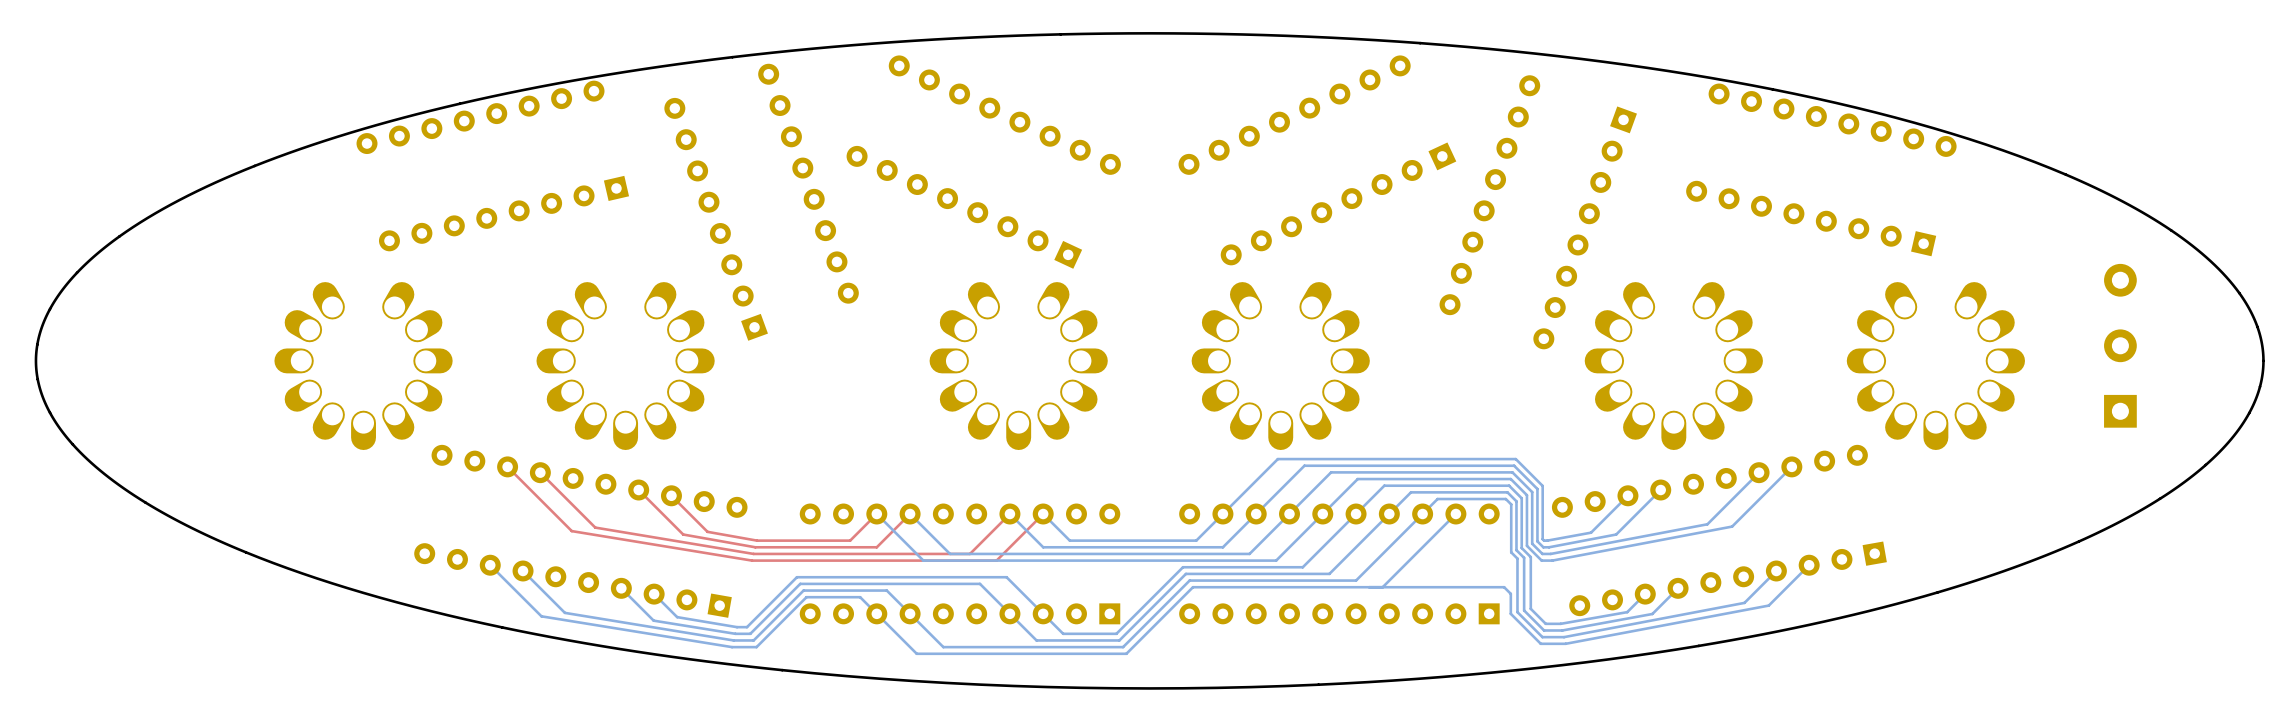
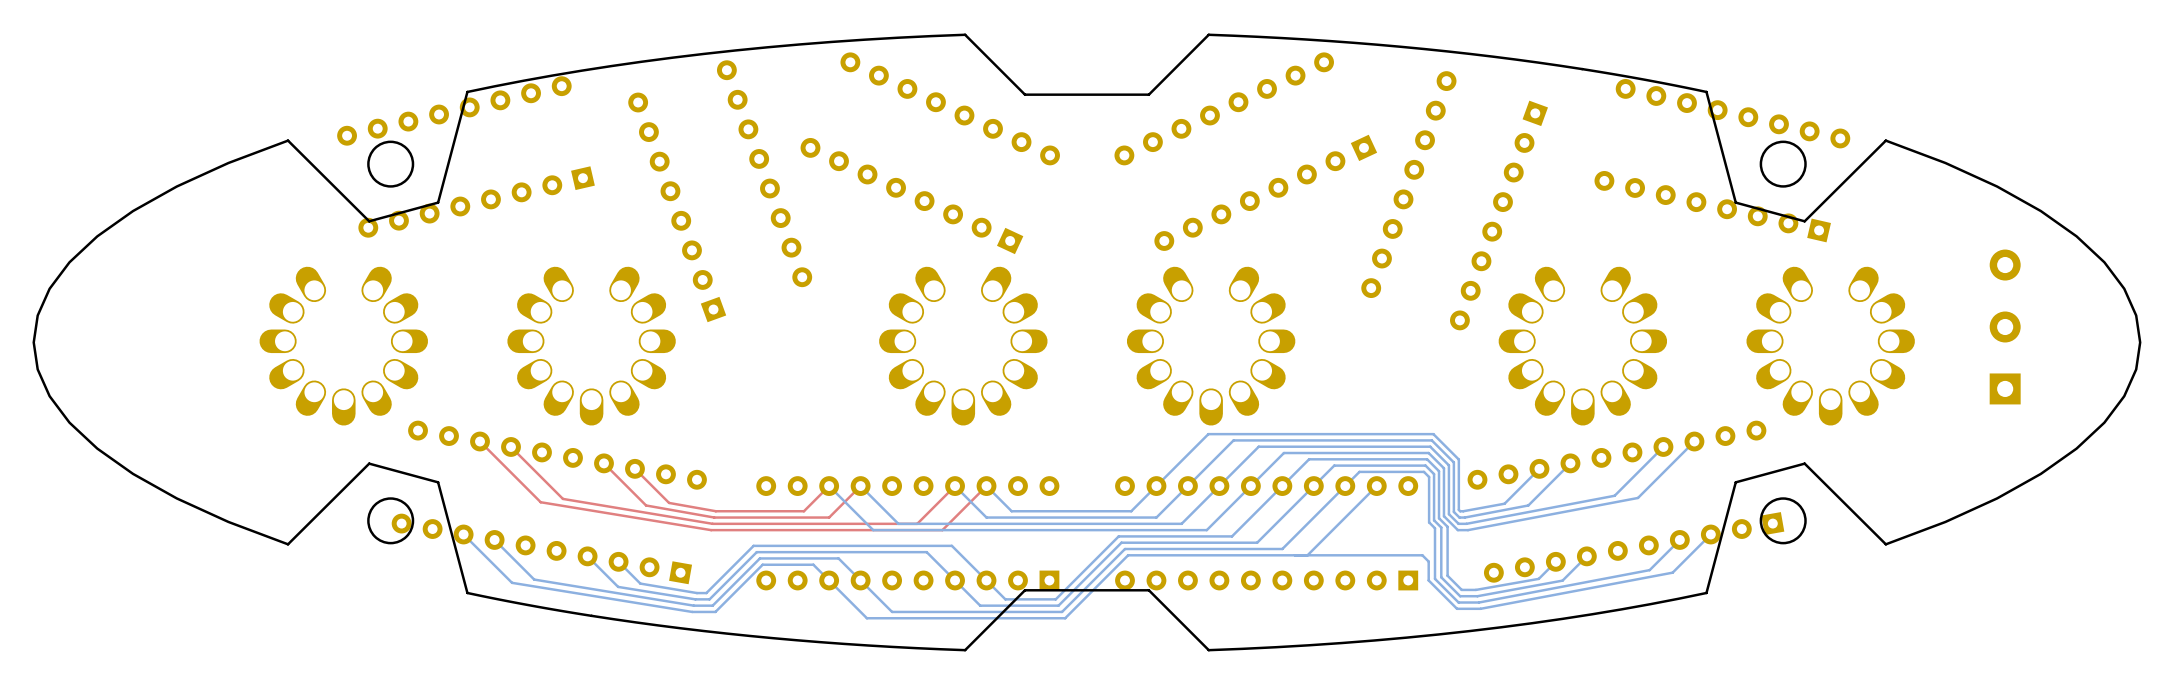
board edge: (1060, 34) (955, 38) (832, 46) (732, 57) (625, 71) (540, 86) (445, 107) (363, 128) (288, 153) (224, 178) (171, 204) (119, 236) (83, 265) (56, 297) (41, 329) (35, 362) (41, 394) (56, 422) (79, 451) (113, 481) (156, 509) (204, 534) (259, 557) (316, 578) (396, 602) (483, 623) (568, 640) (745, 666) (847, 676) (946, 682) (1149, 688) (1343, 683) (1538, 667) (1631, 656) (1731, 640) (1809, 624) (1896, 603) (1966, 583) (2038, 558) (2095, 533) (2146, 507) (2190, 477) (2222, 448) (2245, 419) (2259, 389) (2262, 372) (2263, 354) (2260, 337) (2254, 318) (2233, 285) (2197, 249) (2148, 215) (2088, 184) (2019, 156) (1932, 127) (1855, 107) (1752, 85) (1646, 67) (1535, 53) (1420, 43) (1309, 36) (1173, 33) (1060, 34) -> (1208, 34) (1329, 41) (1470, 53) (1590, 70) (1706, 91) (1735, 202) (1804, 221) (1885, 140) (1945, 163) (1997, 186) (2040, 211) (2076, 236) (2104, 262) (2124, 288) (2136, 315) (2140, 342) (2136, 369) (2124, 396) (2104, 422) (2076, 448) (2040, 473) (1997, 498) (1945, 521) (1885, 544) (1804, 463) (1735, 482) (1706, 592) (1592, 614) (1470, 631) (1341, 643) (1208, 650) (1148, 590) (1024, 590) (965, 650) (844, 643) (703, 630) (583, 614) (467, 592) (438, 482) (369, 463) (288, 544) (228, 521) (176, 498) (133, 473) (97, 448) (69, 422) (49, 396) (37, 369) (33, 342) (37, 315) (49, 288) (69, 262) (97, 236) (133, 211) (176, 186) (228, 163) (288, 140) (369, 221) (438, 202) (467, 91) (581, 70) (703, 53) (832, 41) (965, 34) (1024, 94) (1148, 94) (1208, 34)
round board edge: none -> [367, 140, 415, 188]
round board edge: none -> [1759, 140, 1807, 188]
round board edge: none -> [367, 497, 415, 545]
round board edge: none -> [1759, 497, 1807, 545]

